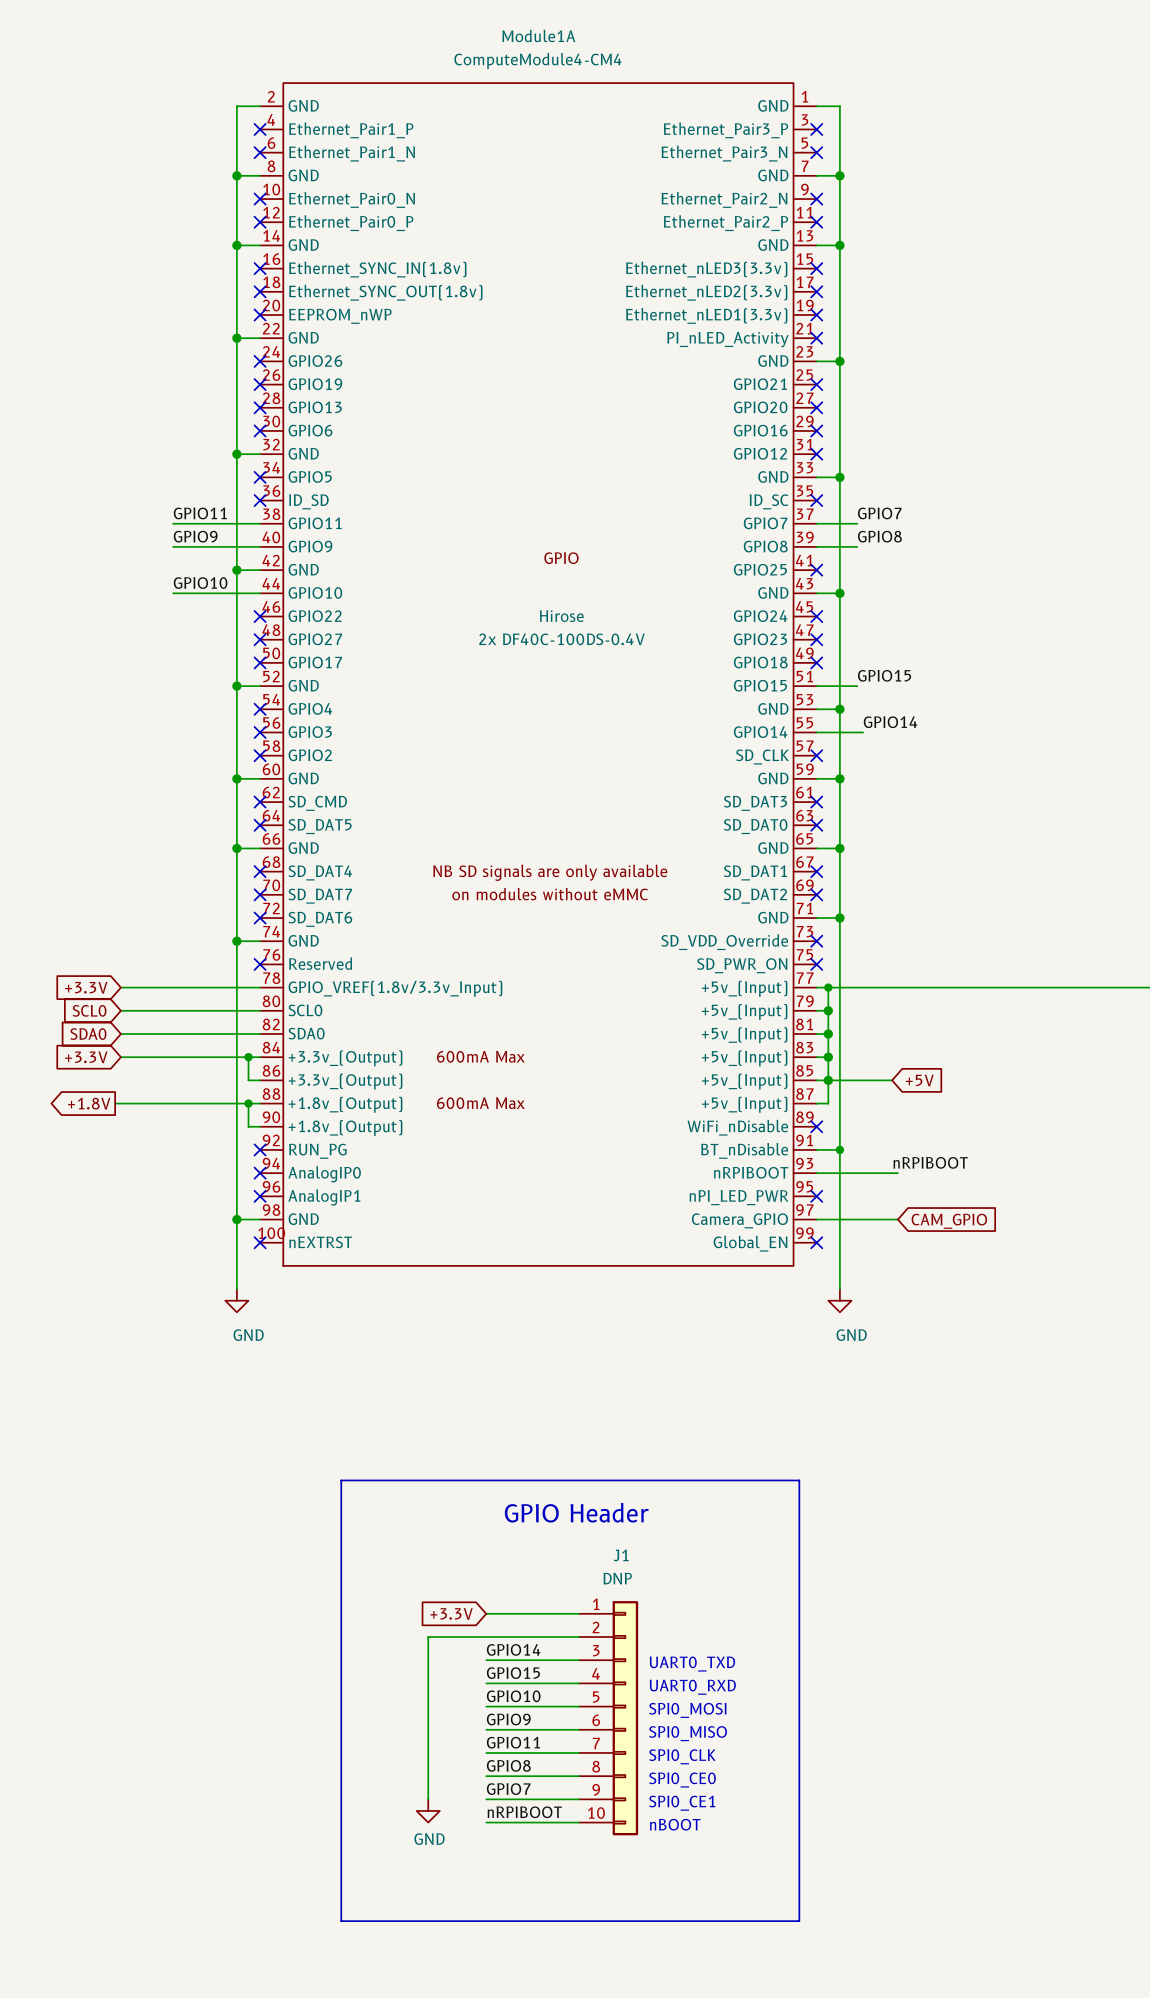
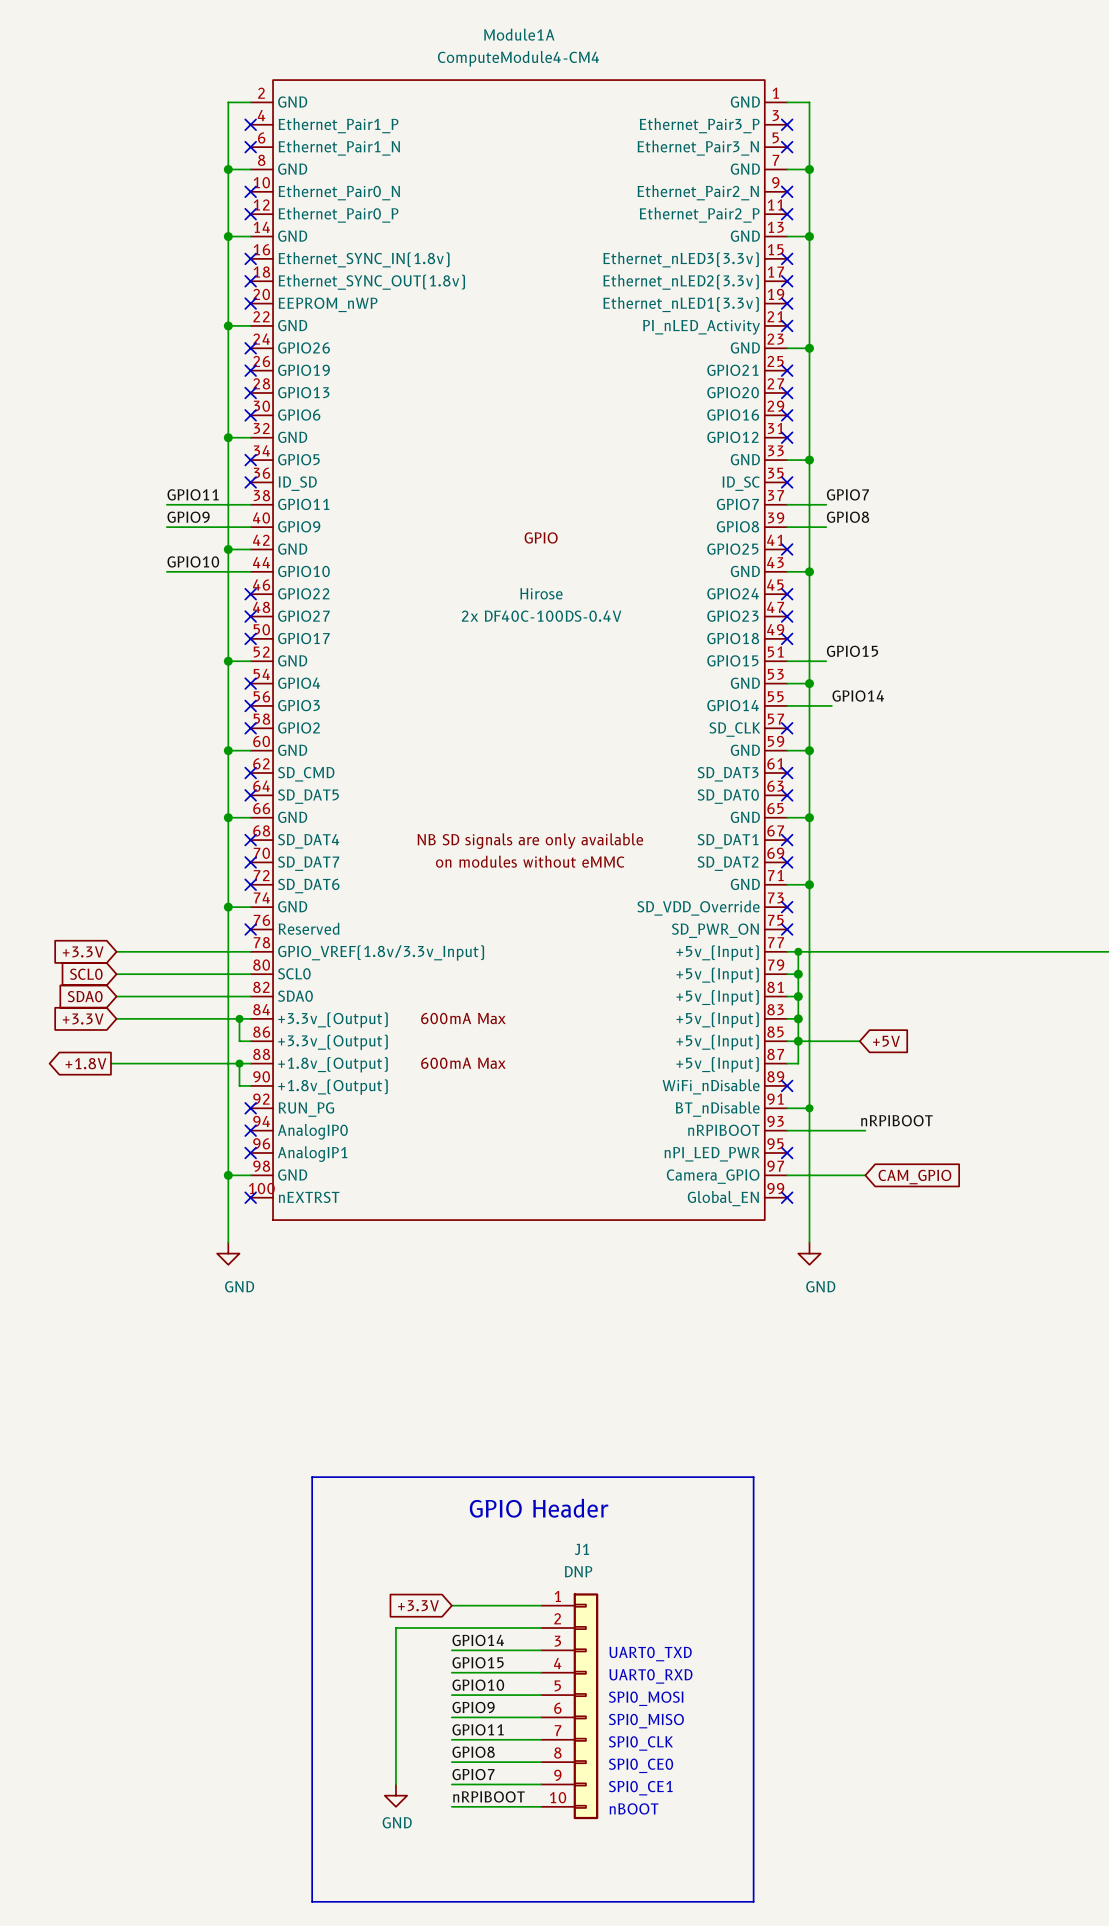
line: (341, 1480) (799, 1480) (799, 1921) (341, 1921) (341, 1480) -> (312, 1477) (753, 1477) (753, 1901) (312, 1901) (312, 1477)
text position: GPIO Header (576, 1512) -> GPIO Header (539, 1508)
global label position: +3.3V (451, 1613) -> +3.3V (418, 1605)
wire: (486, 1613) (579, 1613) -> (451, 1605) (541, 1605)
wire: (579, 1637) (428, 1637) (428, 1799) -> (541, 1628) (395, 1628) (395, 1784)
label position: GPIO14 (513, 1649) -> GPIO14 (478, 1640)
wire: (486, 1660) (579, 1660) -> (451, 1650) (541, 1650)
text position: UART0_TXD (692, 1664) -> UART0_TXD (650, 1654)
label position: GPIO15 (513, 1673) -> GPIO15 (478, 1662)
wire: (486, 1683) (579, 1683) -> (451, 1672) (541, 1672)
text position: UART0_RXD (692, 1687) -> UART0_RXD (650, 1676)
label position: GPIO10 (513, 1696) -> GPIO10 (478, 1685)
wire: (486, 1706) (579, 1706) -> (451, 1695) (541, 1695)
text position: SPI0_MOSI (687, 1710) -> SPI0_MOSI (646, 1698)
J1 position: (608, 1718) -> (569, 1706)
label position: GPIO9 (508, 1719) -> GPIO9 (473, 1707)
wire: (486, 1729) (579, 1729) -> (451, 1717) (541, 1717)
text position: SPI0_MISO (688, 1733) -> SPI0_MISO (646, 1721)
label position: GPIO11 (513, 1742) -> GPIO11 (478, 1729)
wire: (486, 1752) (579, 1752) -> (451, 1739) (541, 1739)
text position: SPI0_CLK (682, 1756) -> SPI0_CLK (640, 1743)
label position: GPIO8 (508, 1765) -> GPIO8 (473, 1752)
wire: (486, 1776) (579, 1776) -> (451, 1762) (541, 1762)
text position: SPI0_CE0 (682, 1780) -> SPI0_CE0 (641, 1765)
label position: GPIO7 (508, 1789) -> GPIO7 (473, 1774)
wire: (486, 1799) (579, 1799) -> (451, 1784) (541, 1784)
text position: SPI0_CE1 (682, 1803) -> SPI0_CE1 (640, 1788)
power symbol position: GND (428, 1810) -> GND (395, 1795)
label position: nRPIBOOT (524, 1812) -> nRPIBOOT (489, 1796)
wire: (486, 1822) (579, 1822) -> (451, 1806) (541, 1806)
text position: nBOOT (675, 1824) -> nBOOT (634, 1808)

